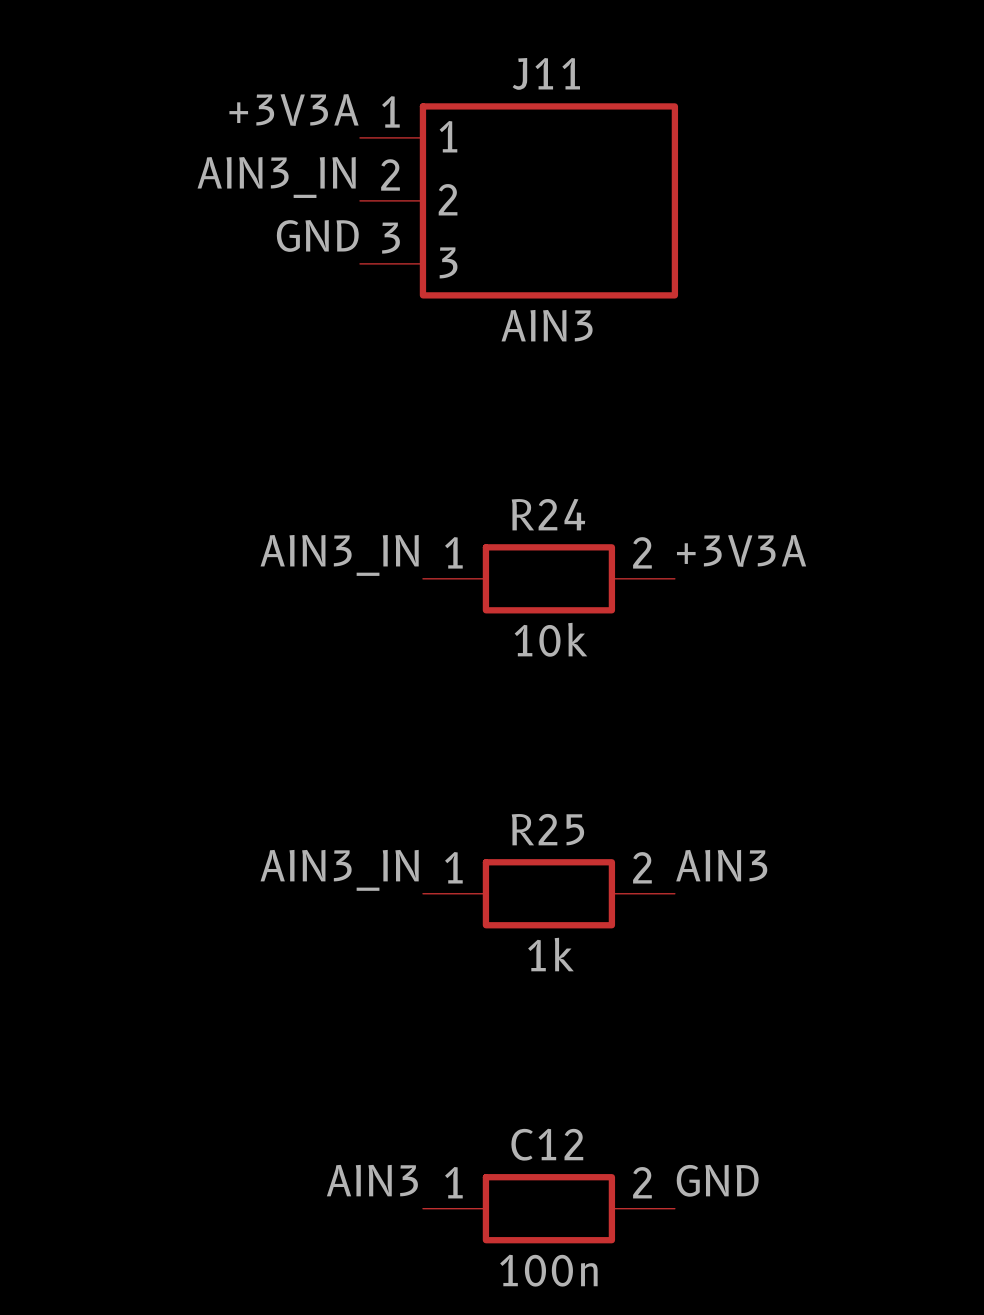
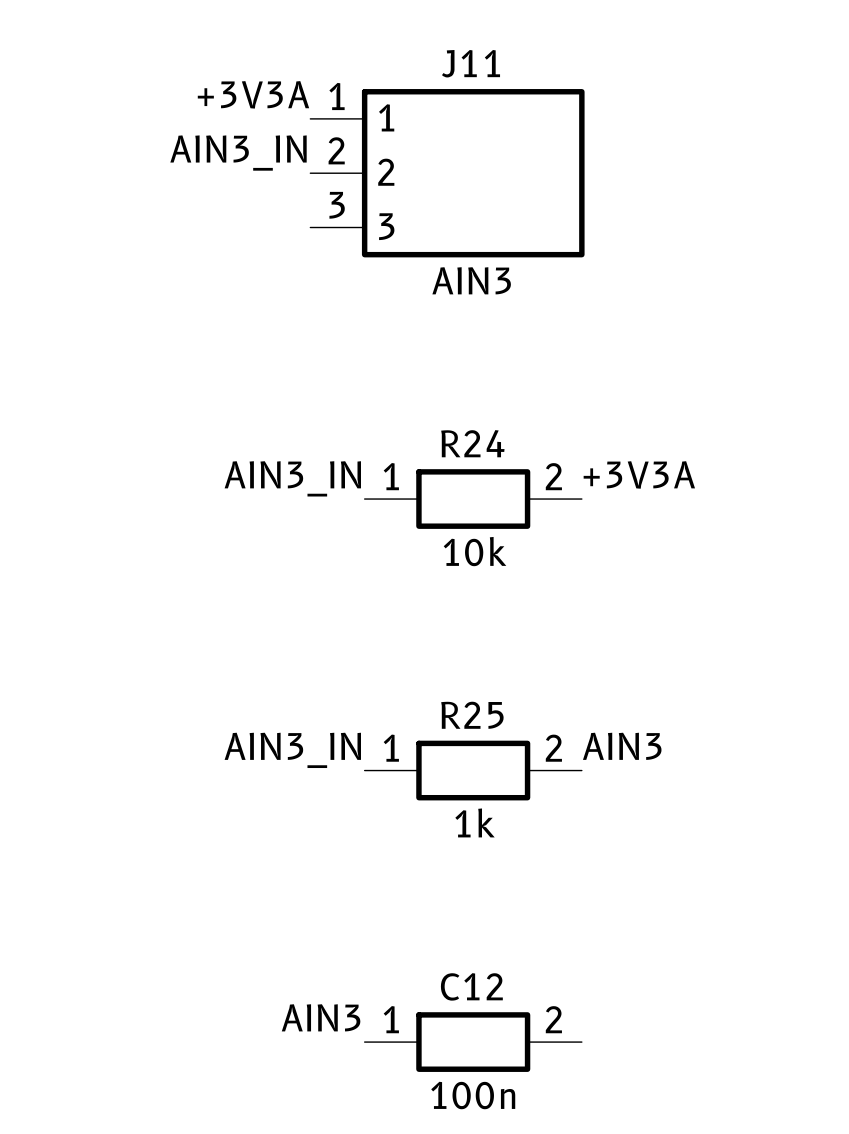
label: GND (317, 235) -> none
label: GND (717, 1180) -> none

